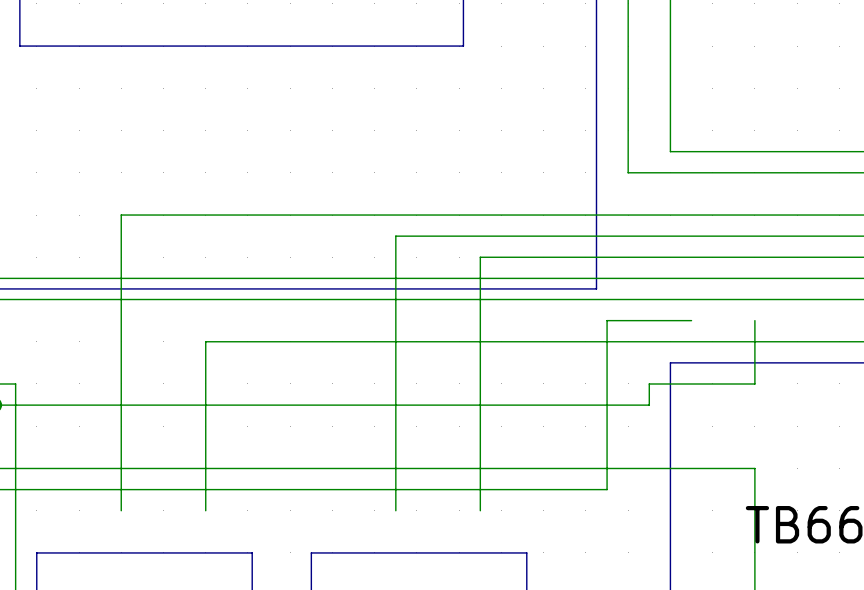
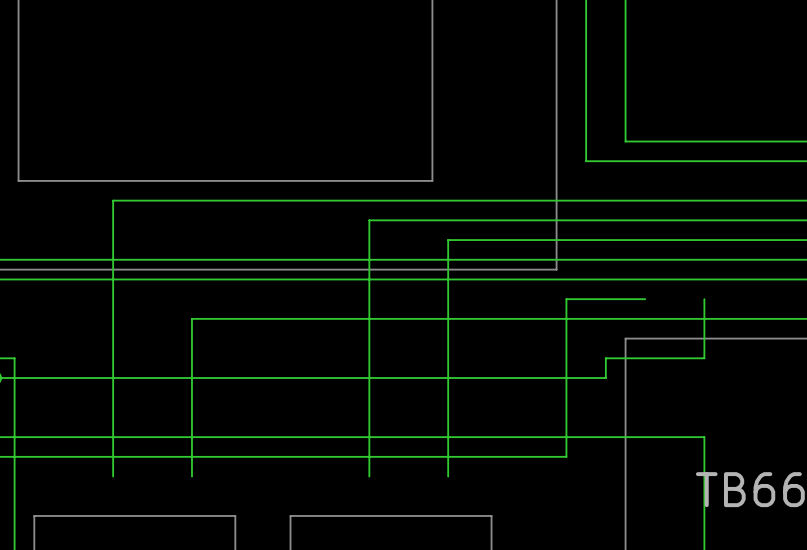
line: (19, 46) (463, 46) -> (18, 42) (18, 180) (432, 180) (432, 42)

